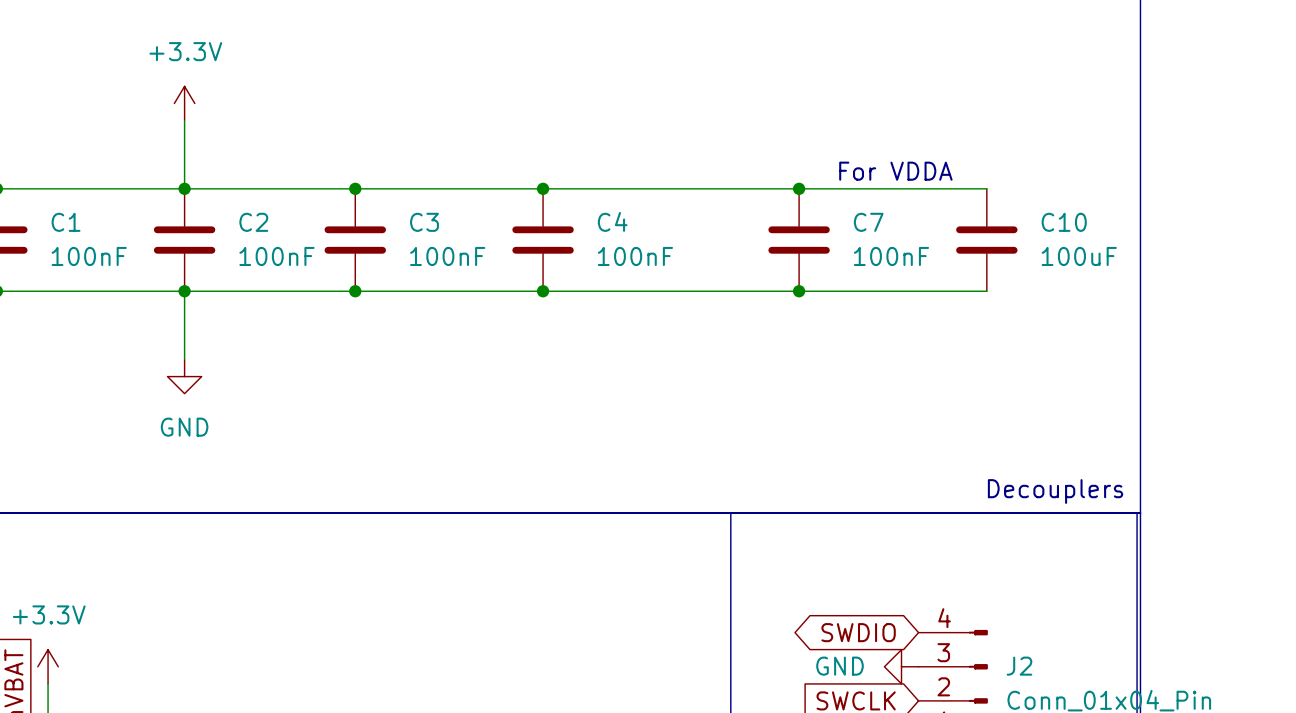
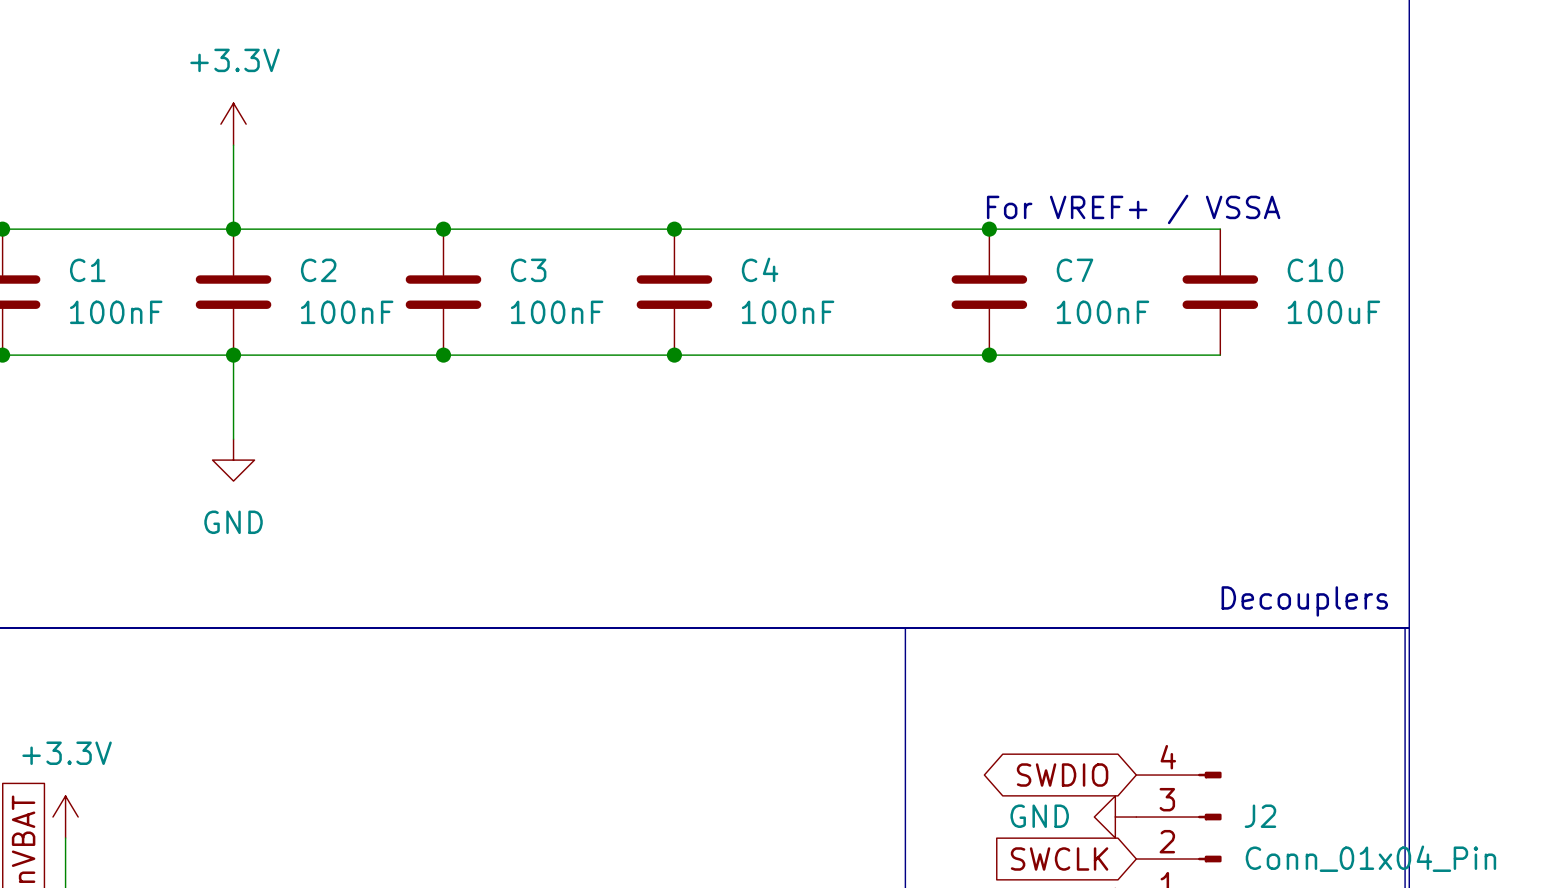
text: For VDDA (895, 171) -> none
text: none -> For VREF+ / VSSA (1133, 209)

